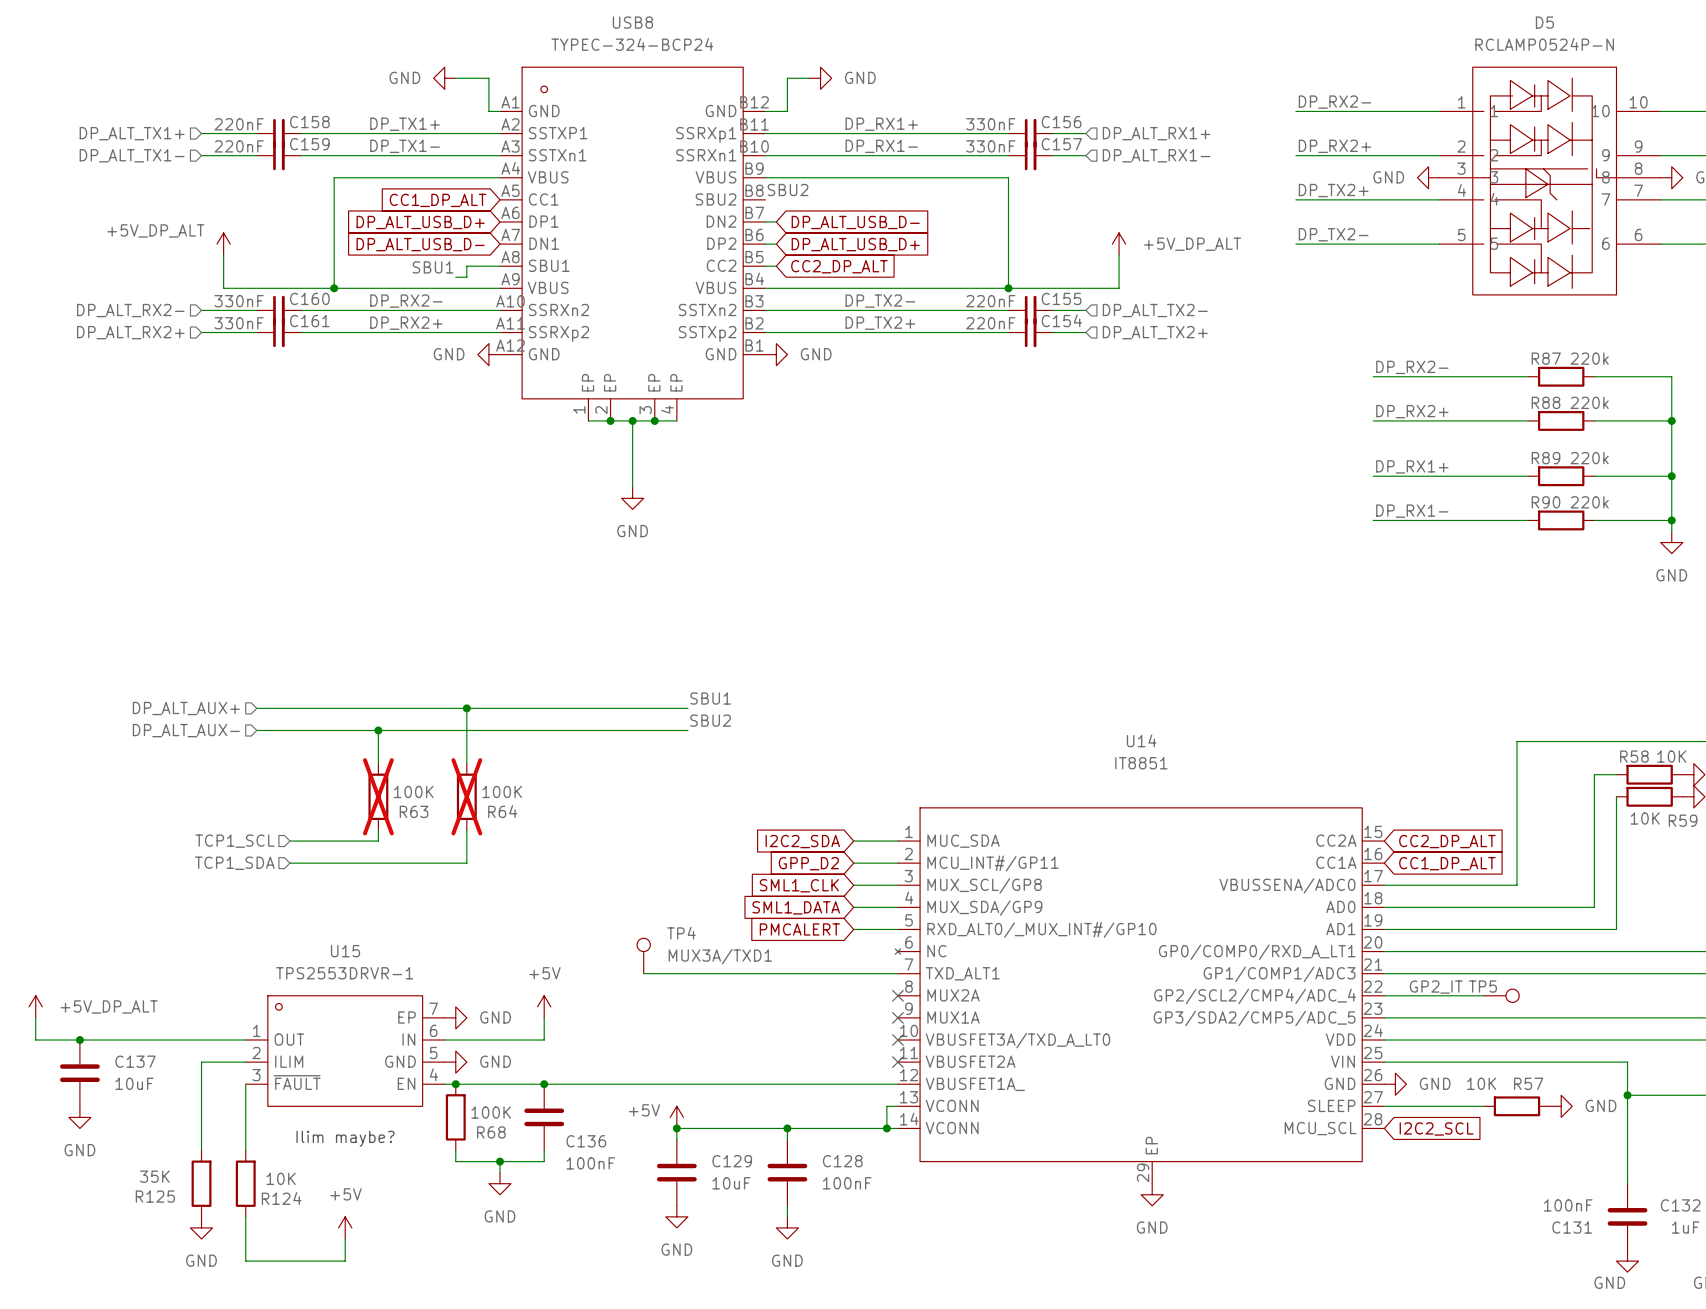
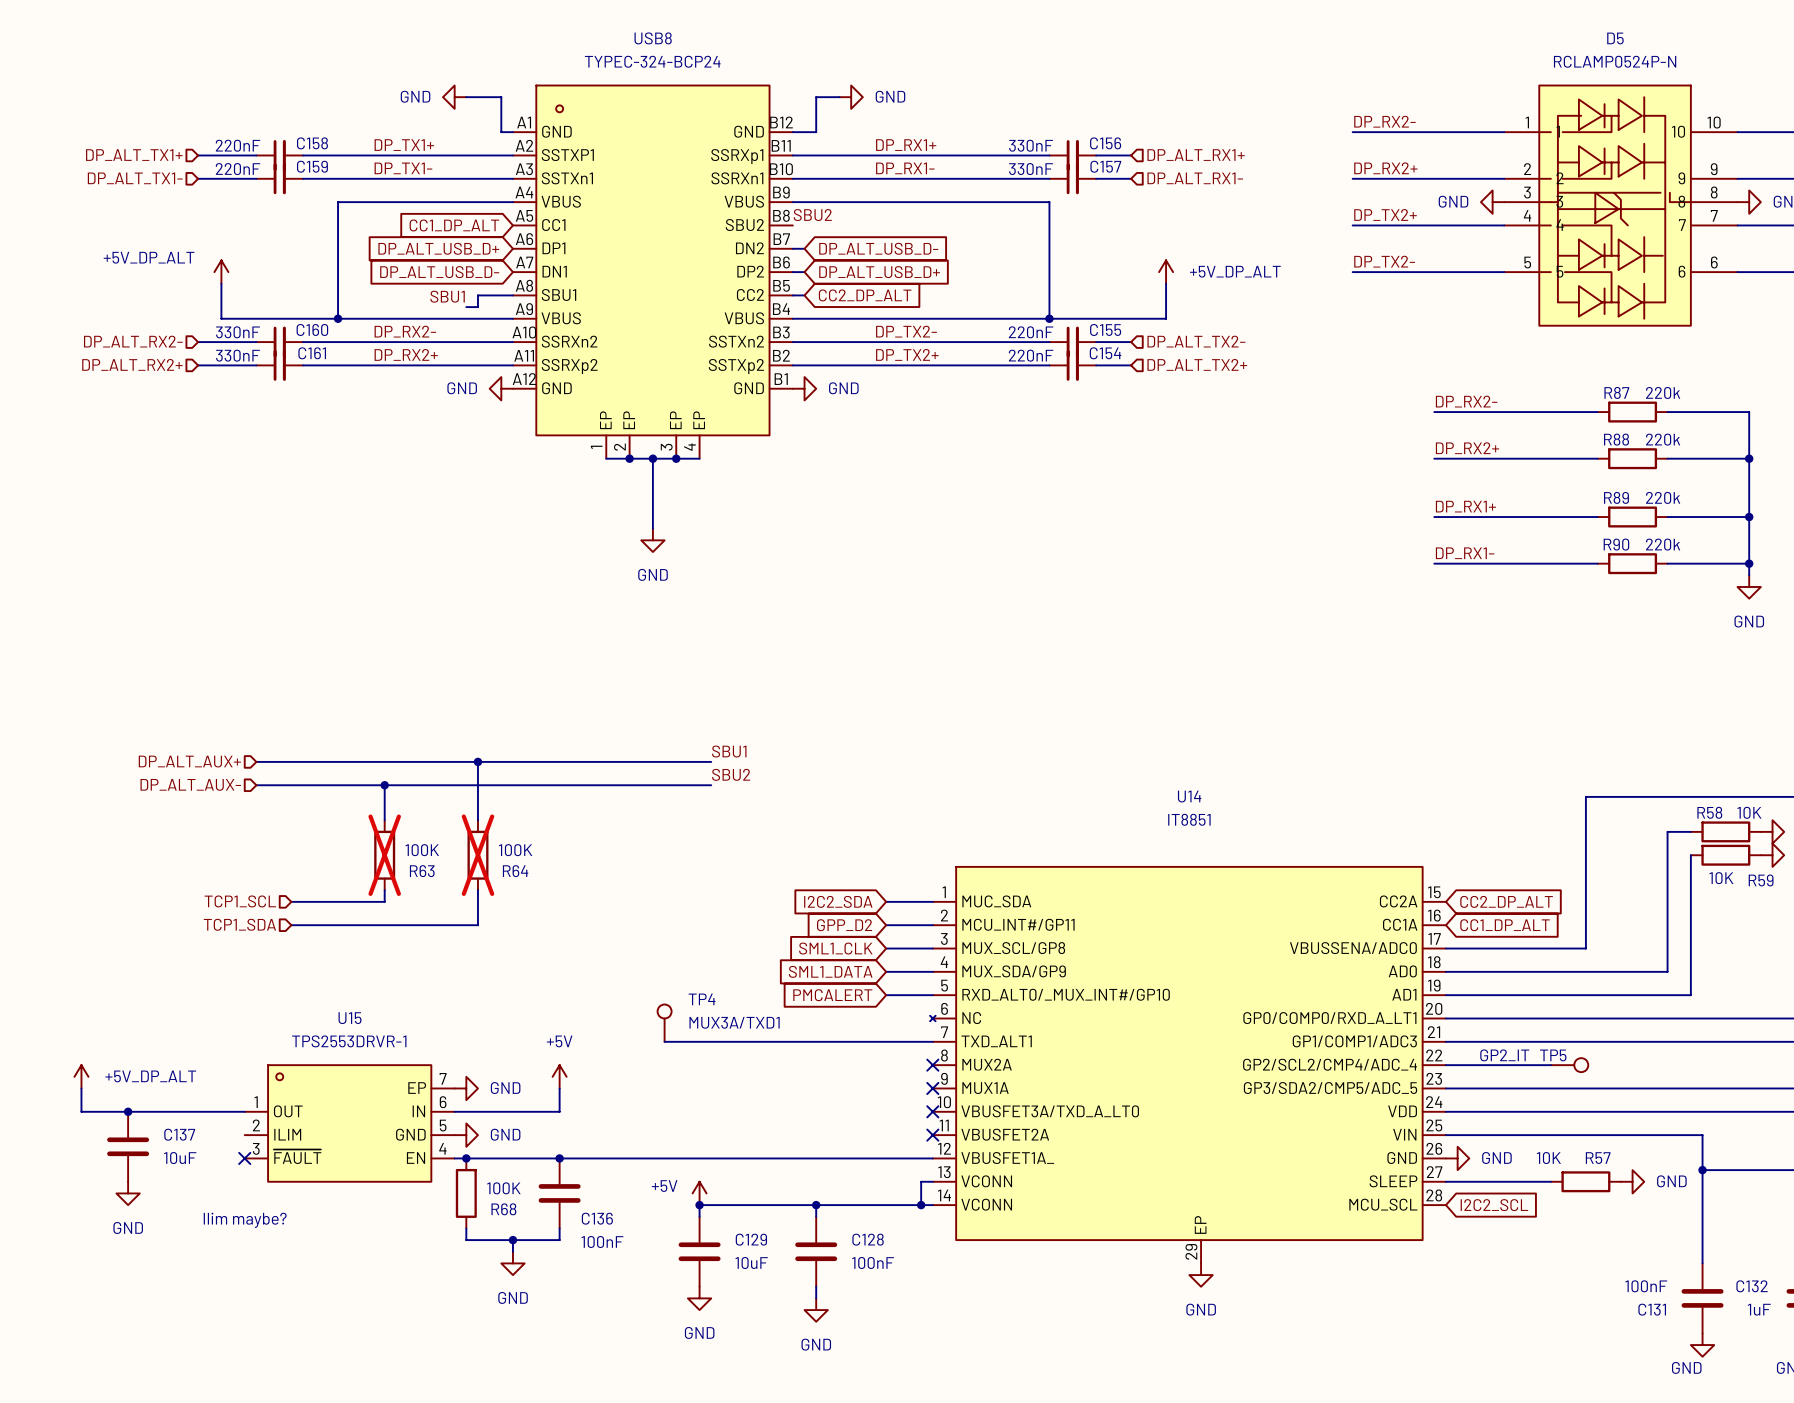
power symbol position: +5V_DP_ALT (35, 1006) -> +5V_DP_ALT (81, 1076)
wire: (35, 1017) (35, 1040) (90, 1040) -> (81, 1088) (81, 1111)
junction: (79, 1040) -> none
junction: none -> (128, 1111)
wire: (245, 1062) (201, 1062) (201, 1150) -> none
C137 position: (79, 1073) -> (128, 1146)
wire: (245, 1084) (245, 1150) -> none
no-connect mark: none -> (244, 1158)
power symbol position: GND (79, 1117) -> GND (128, 1193)
text position: Ilim maybe? (345, 1138) -> Ilim maybe? (245, 1220)
R125: 35K (201, 1183) -> none
R124: 10K (245, 1183) -> none
wire: (245, 1216) (245, 1261) (345, 1261) (345, 1238) -> none
power symbol: GND (201, 1227) -> none
power symbol: +5V (345, 1227) -> none

